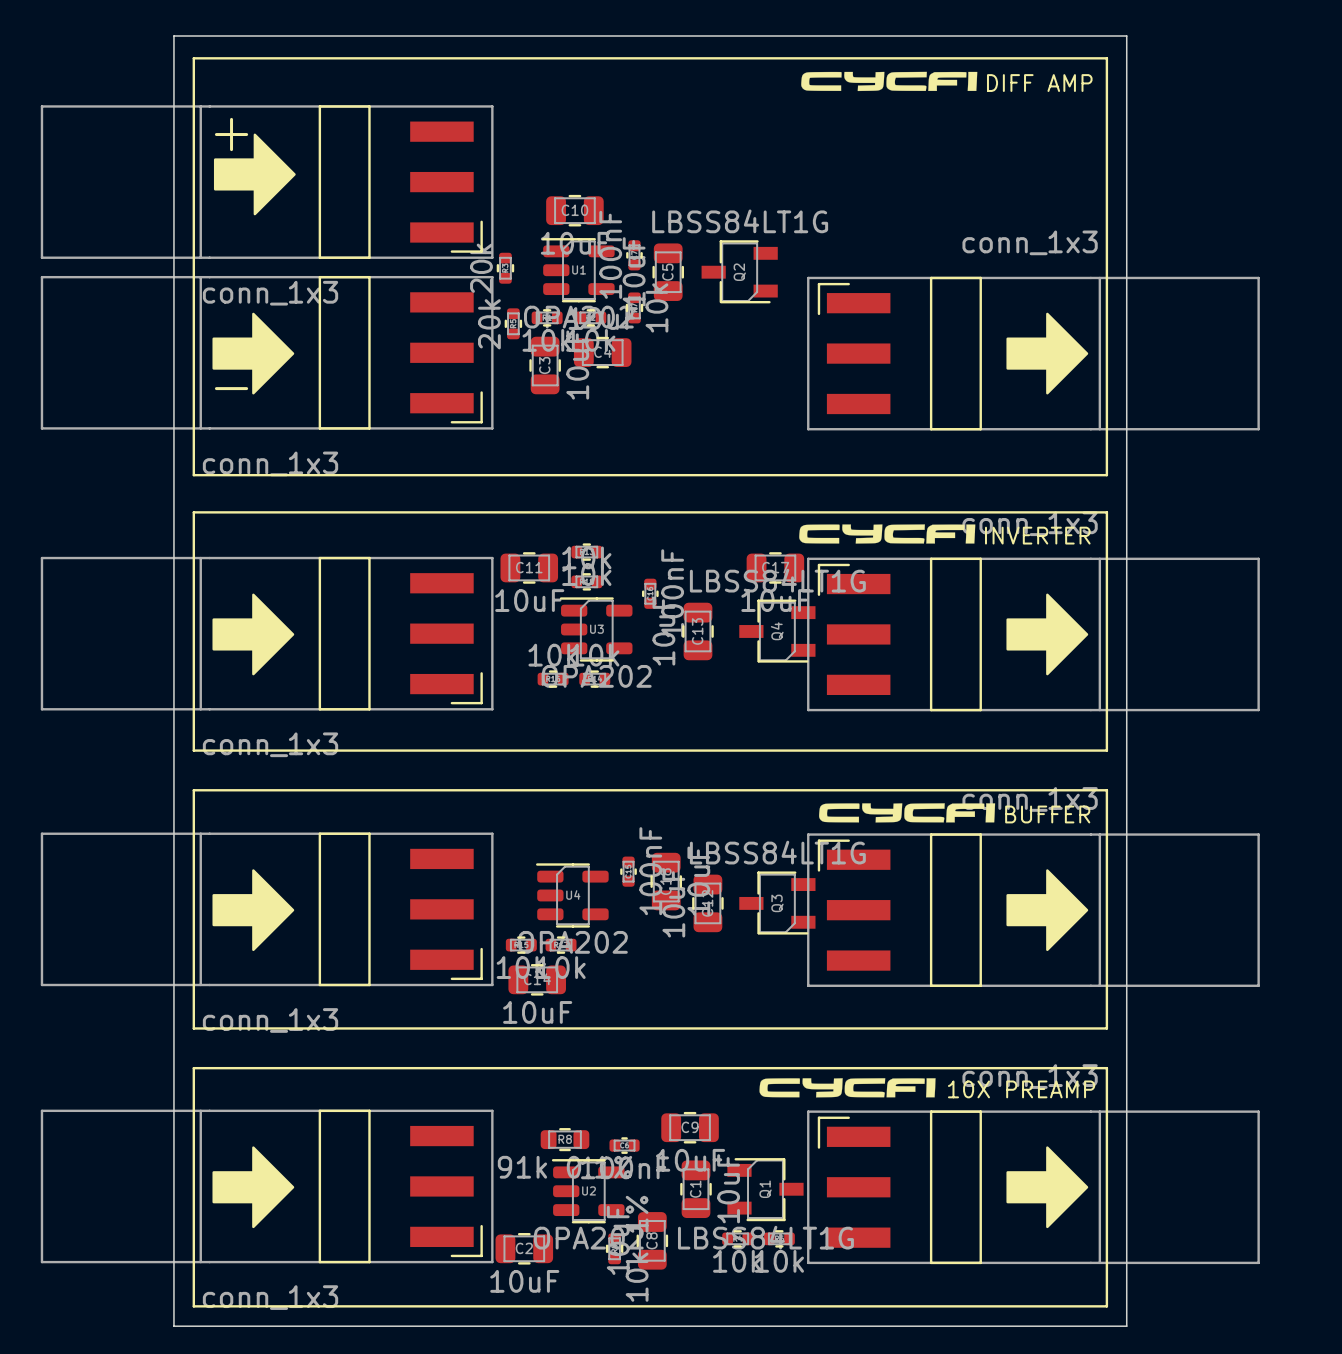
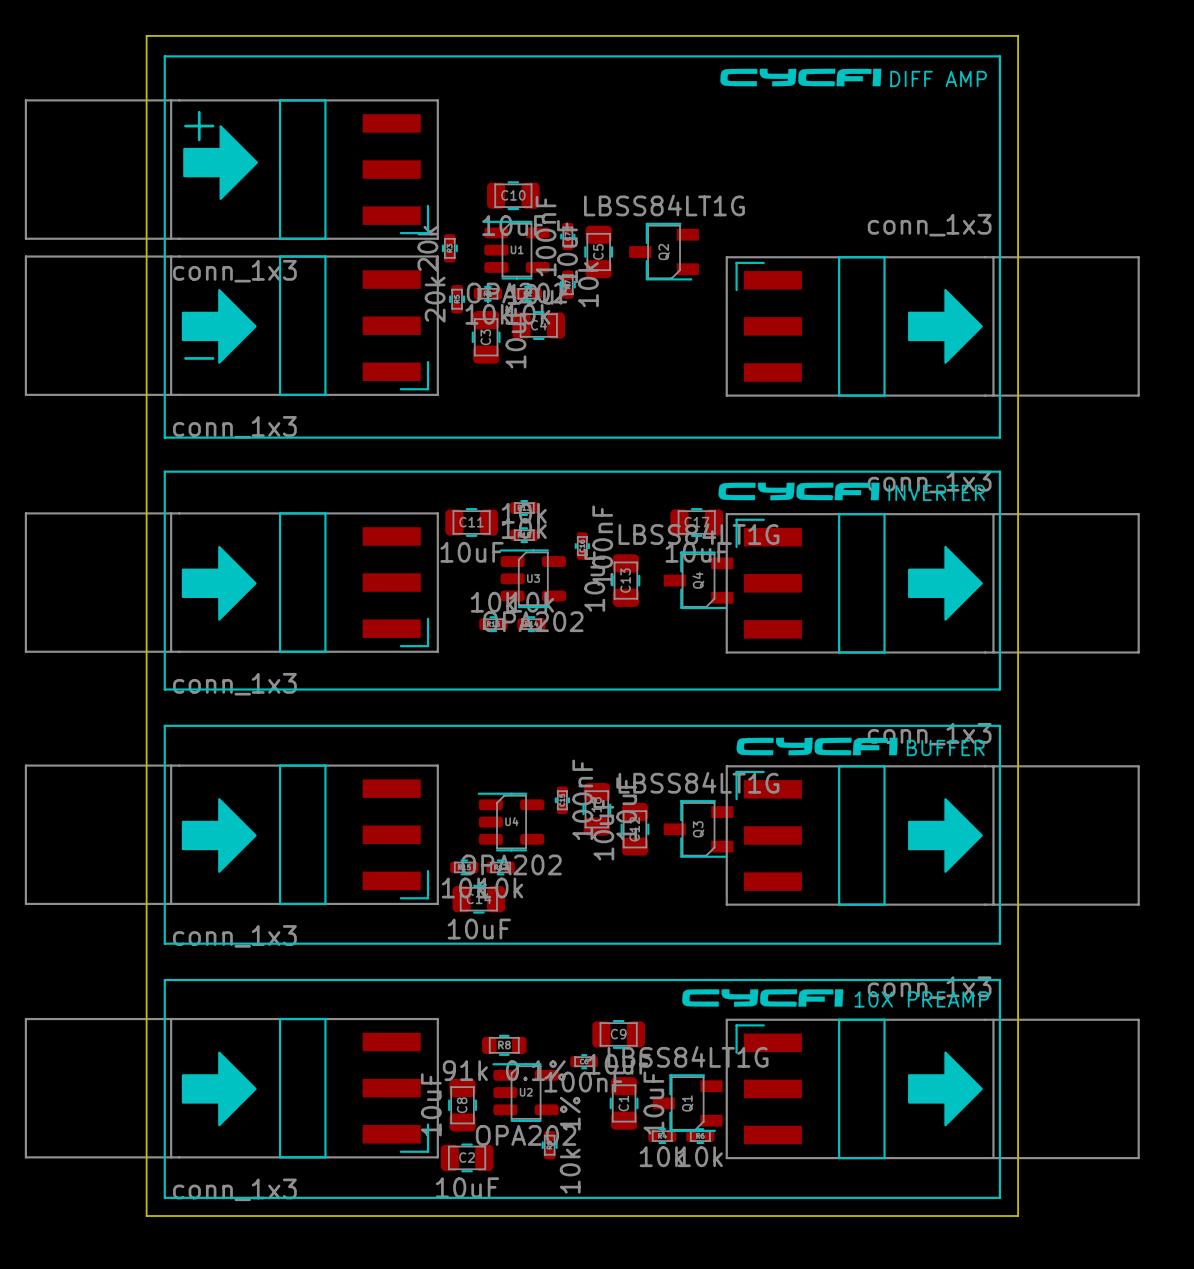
part position: (624, 1145) -> (584, 1061)
C1 position: (696, 1189) -> (624, 1103)
Q1 rotation: 0° (765, 1189) -> 180° (687, 1103)
C8 position: (652, 1240) -> (462, 1105)
C2 position: (524, 1248) -> (467, 1157)

